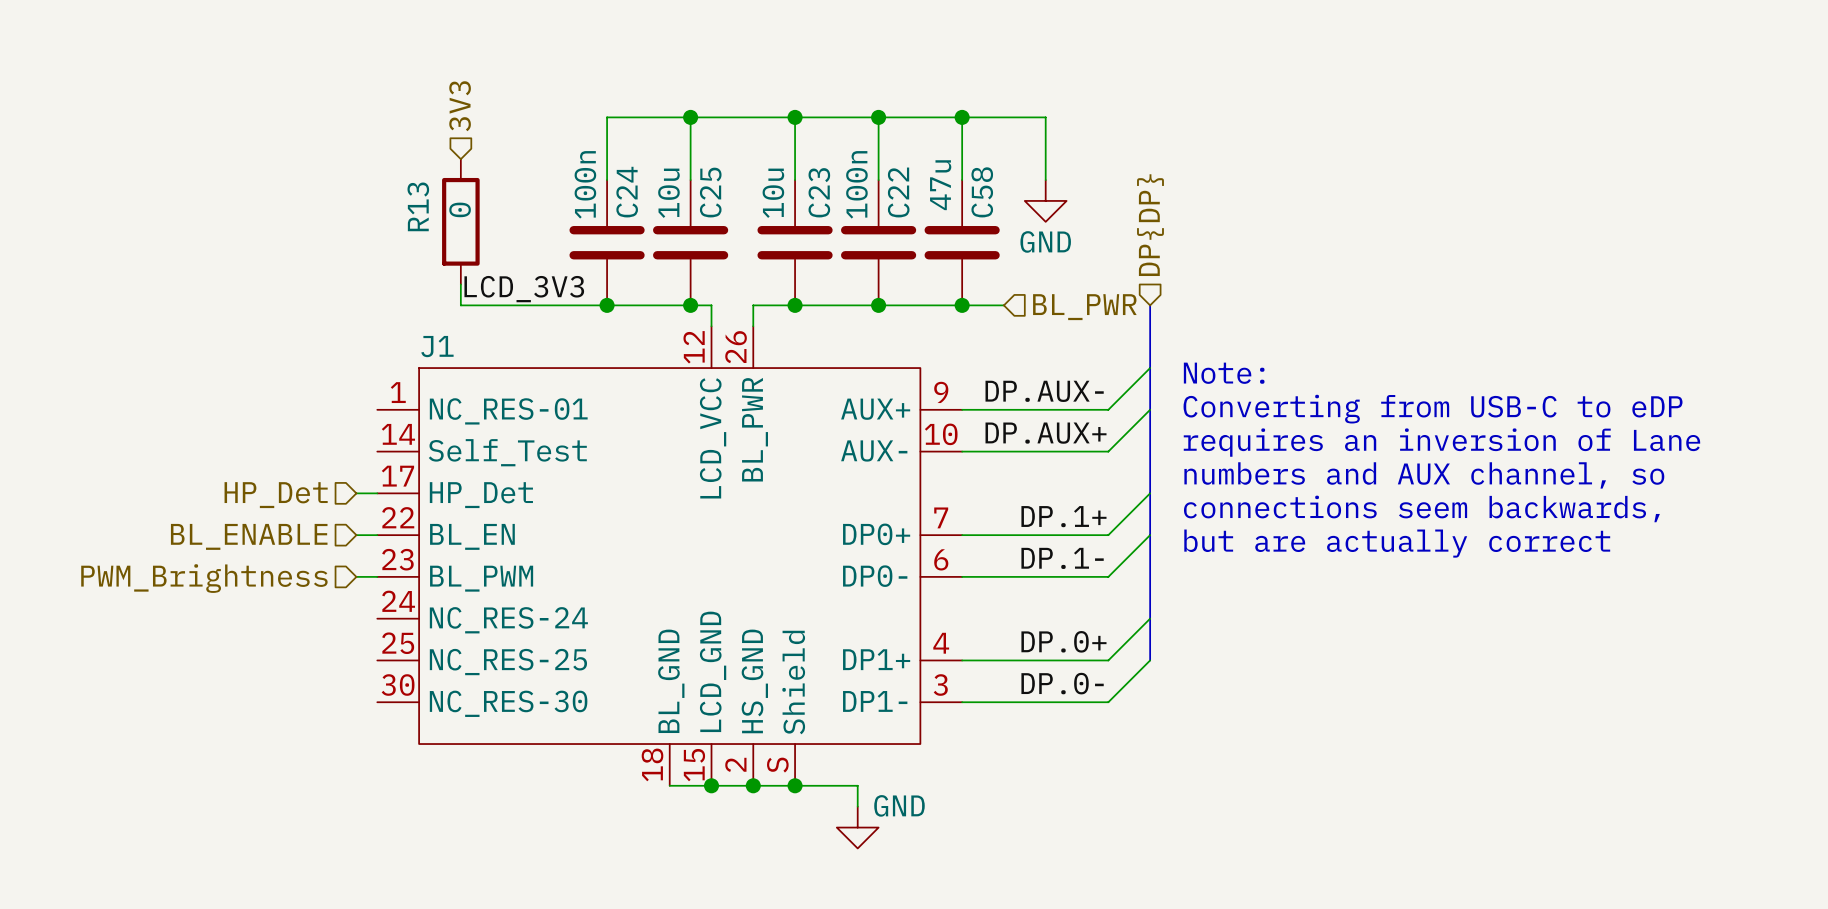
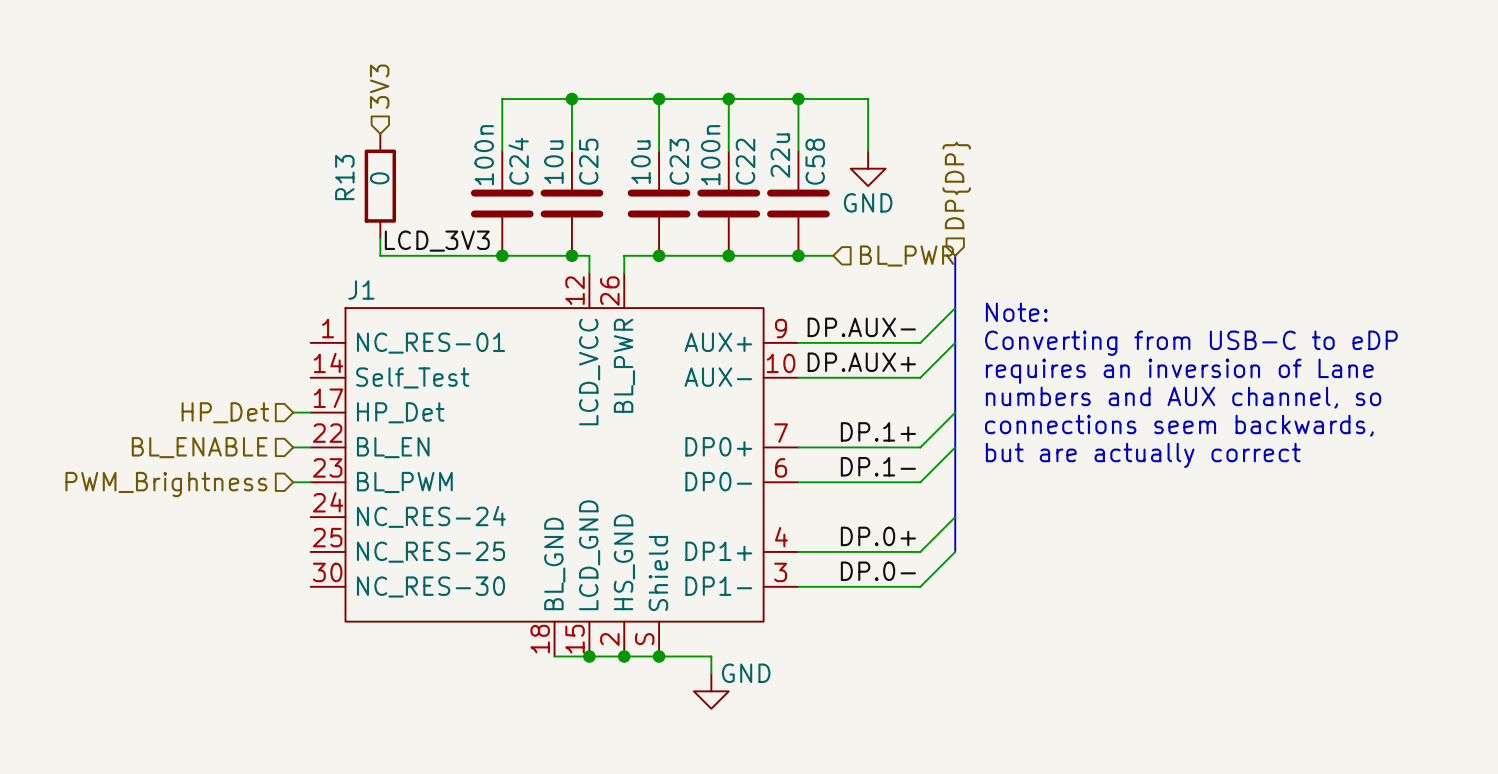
C58 value: 47u (940, 185) -> 22u (780, 155)

